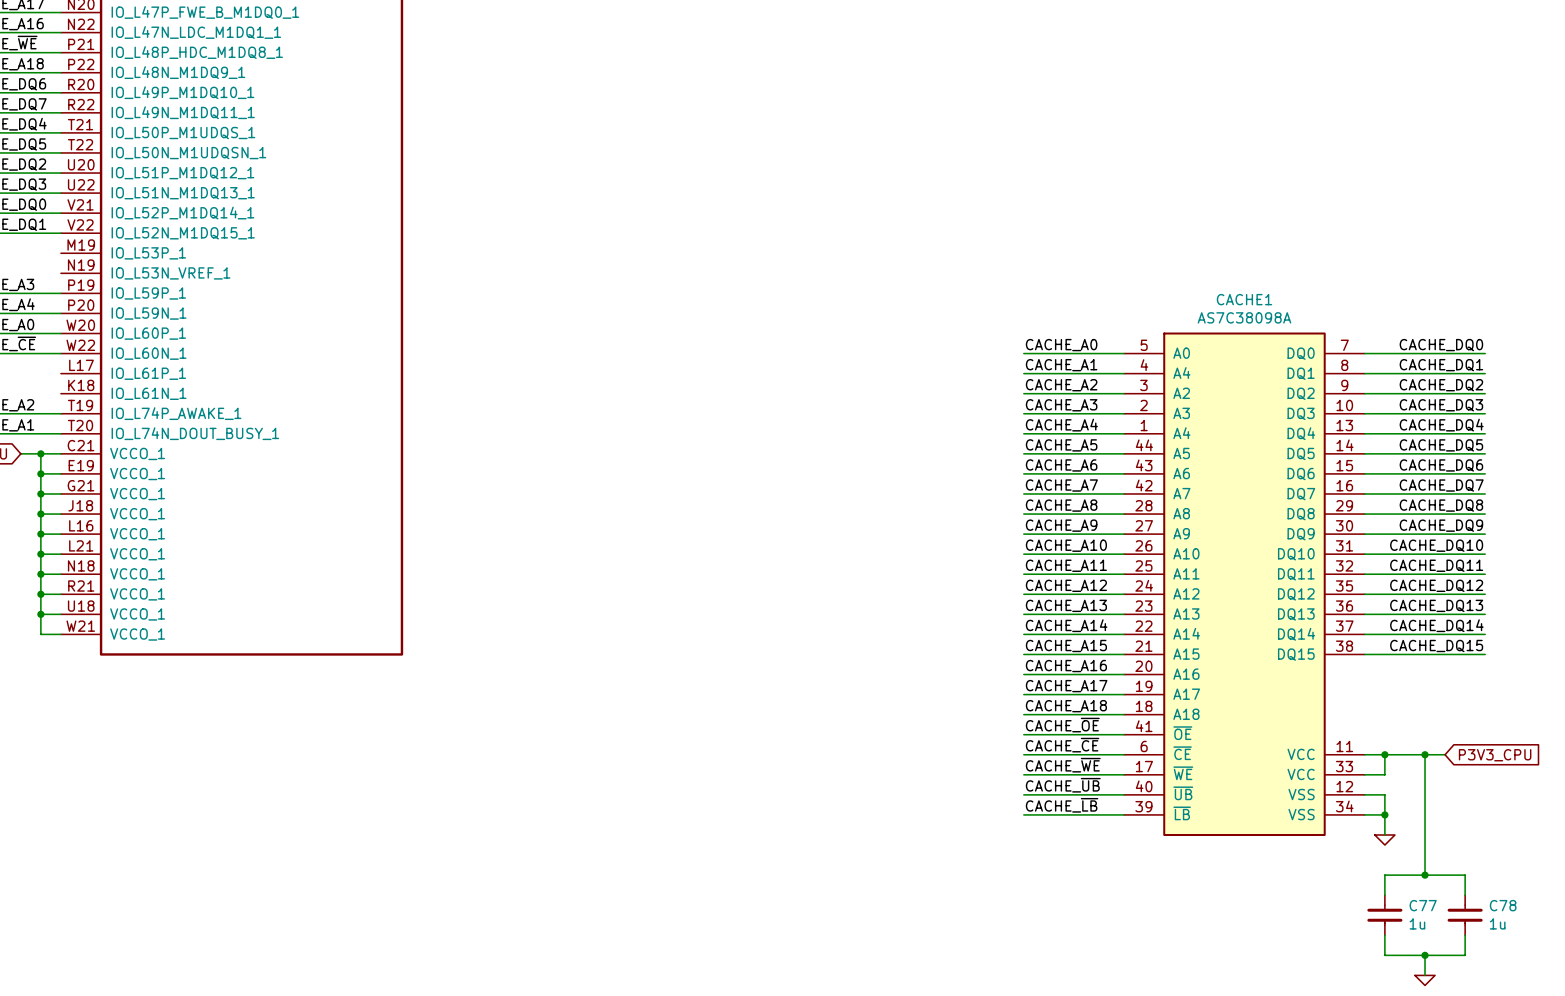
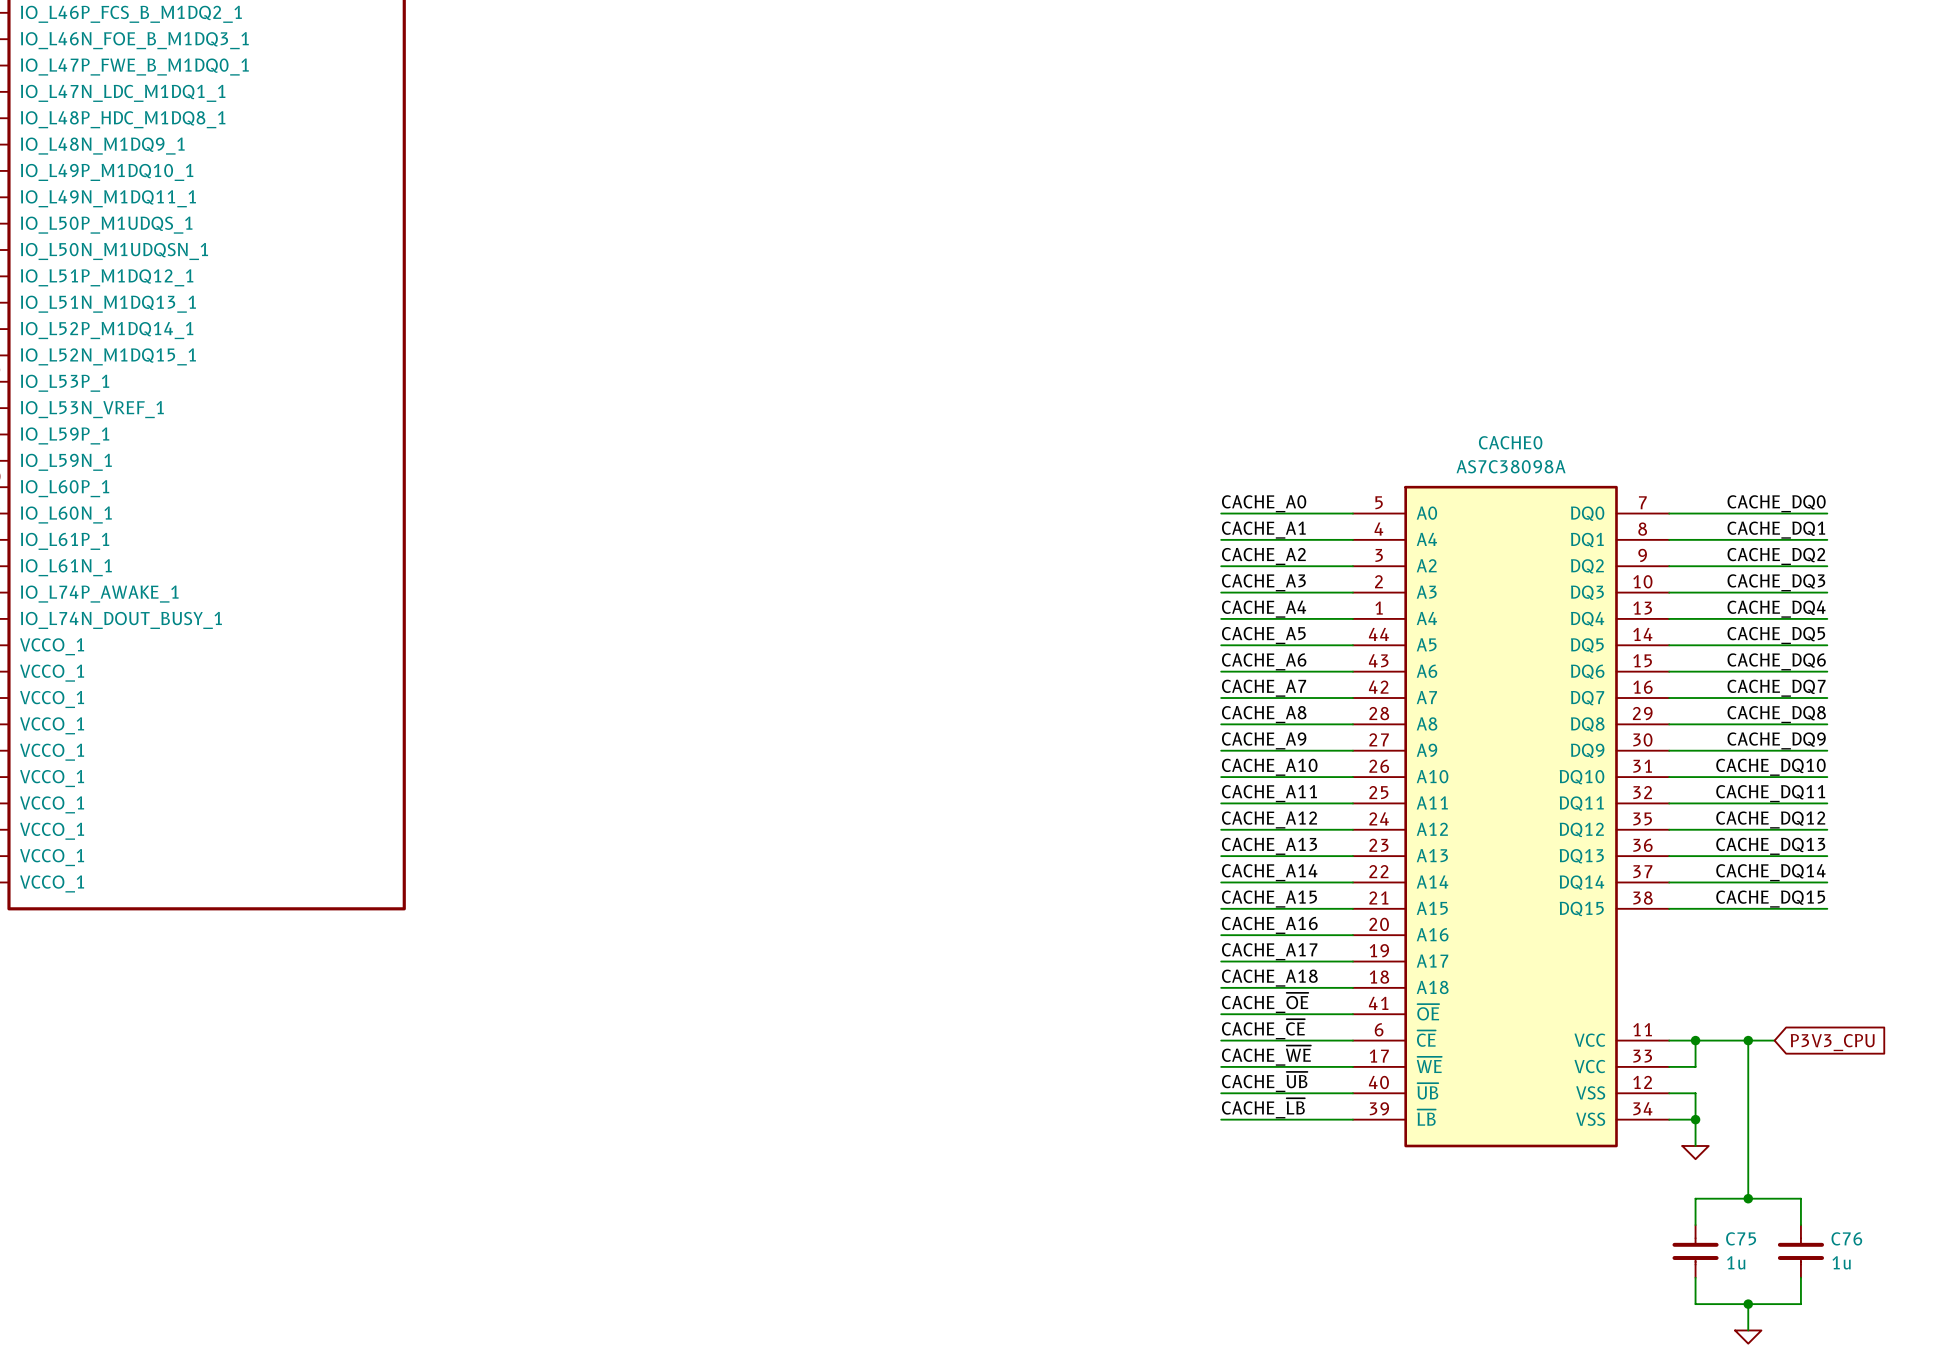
CACHE1 name: CACHE1 (1244, 299) -> CACHE0 (1510, 442)
C77 name: C77 (1423, 905) -> C75 (1741, 1238)
C78 name: C78 (1503, 905) -> C76 (1846, 1238)

